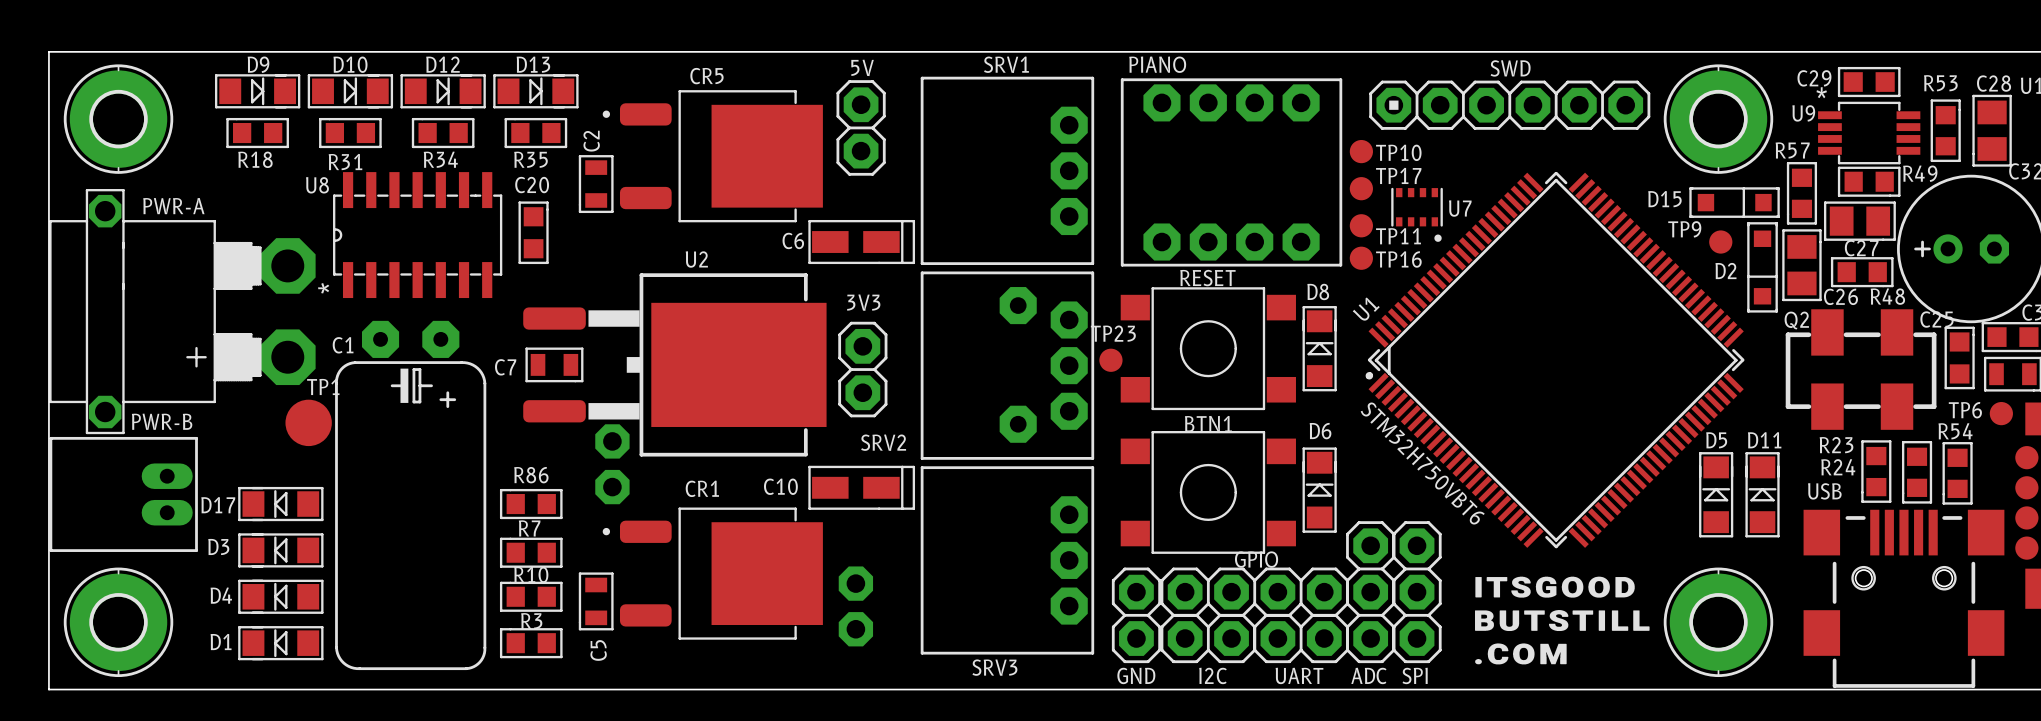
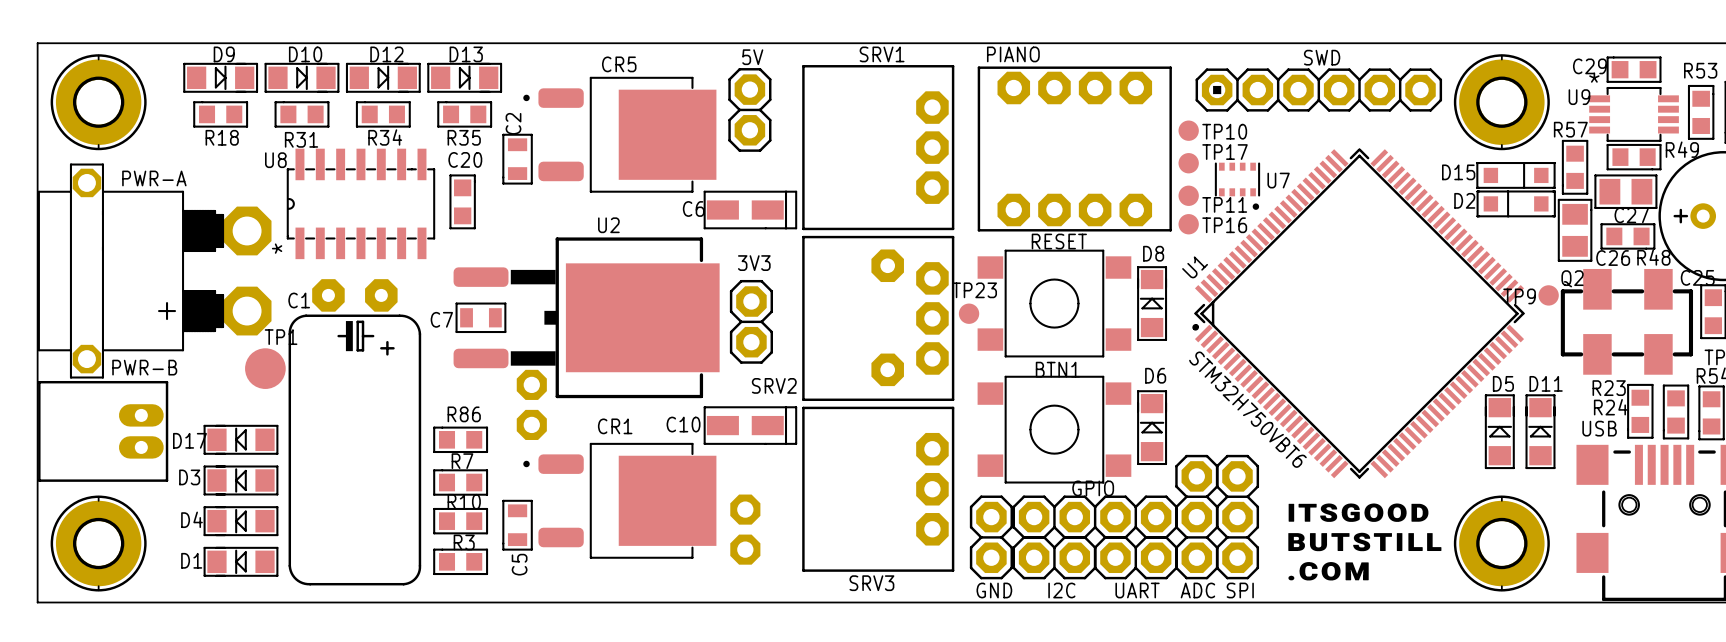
TP9 name position: TP9 (1684, 229) -> TP9 (1519, 296)
TP9 position: (1720, 242) -> (1548, 295)
D2 rotation: 0° (1762, 267) -> 90° clockwise (1516, 203)

